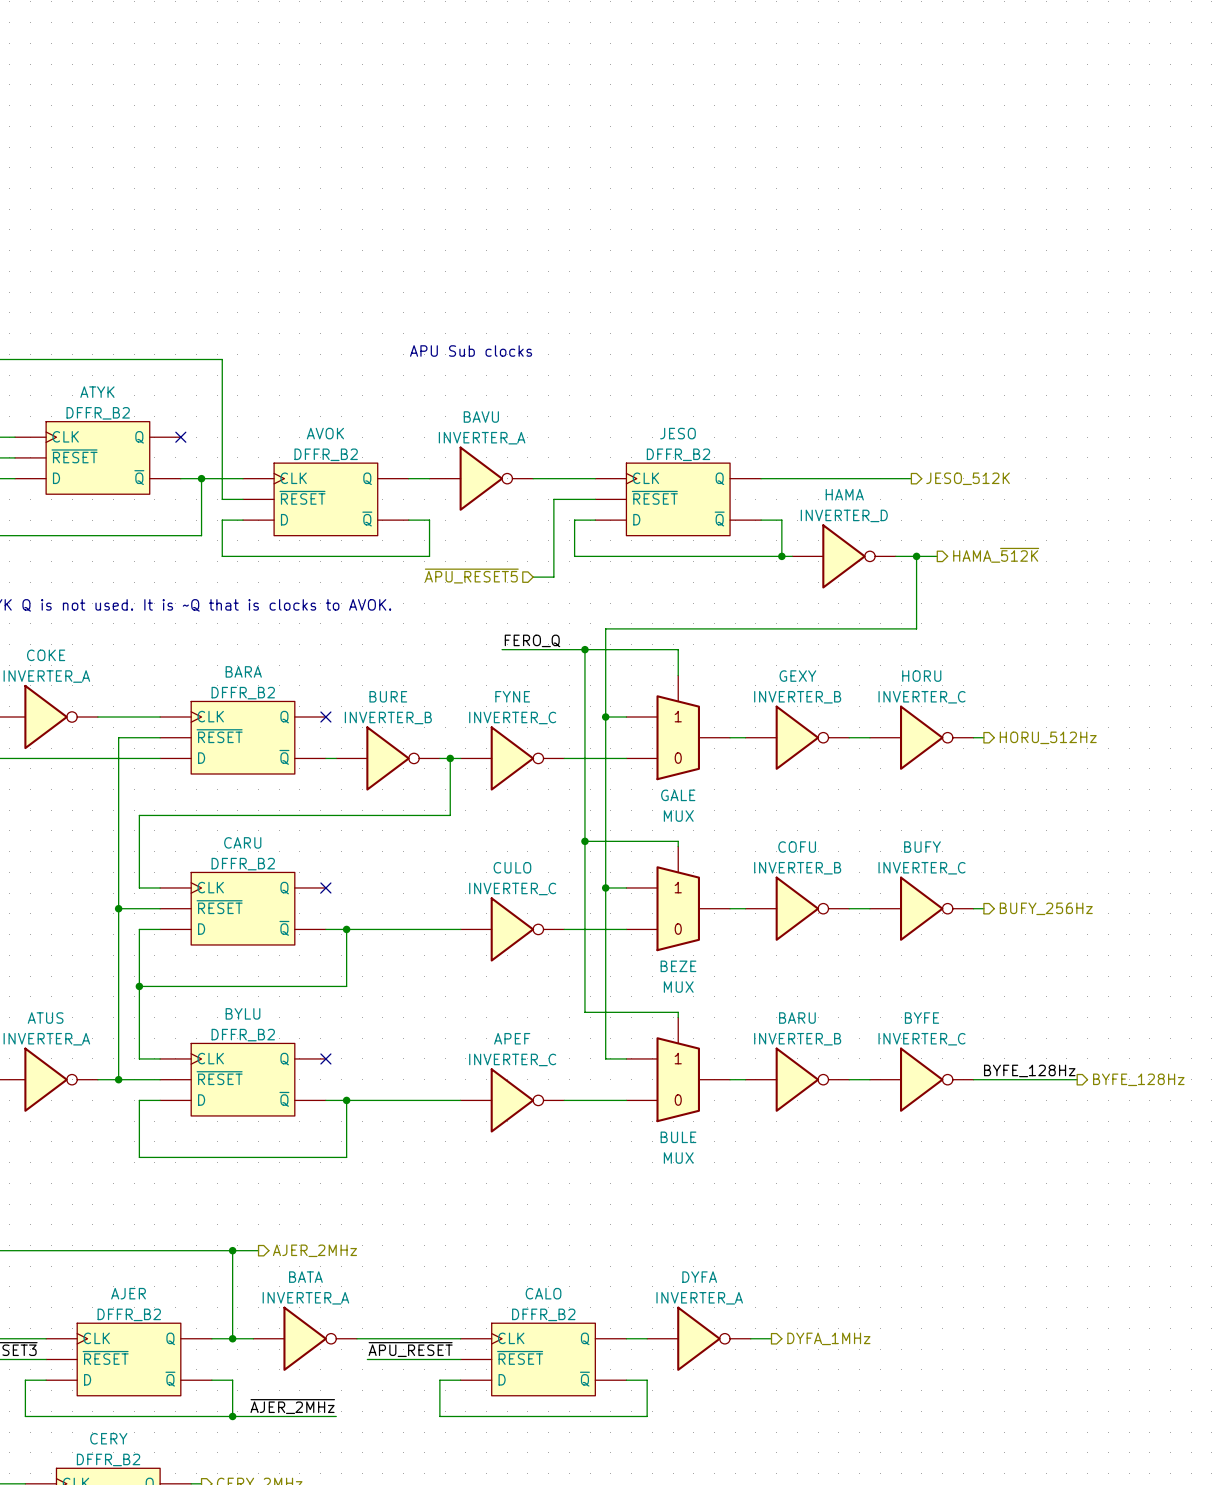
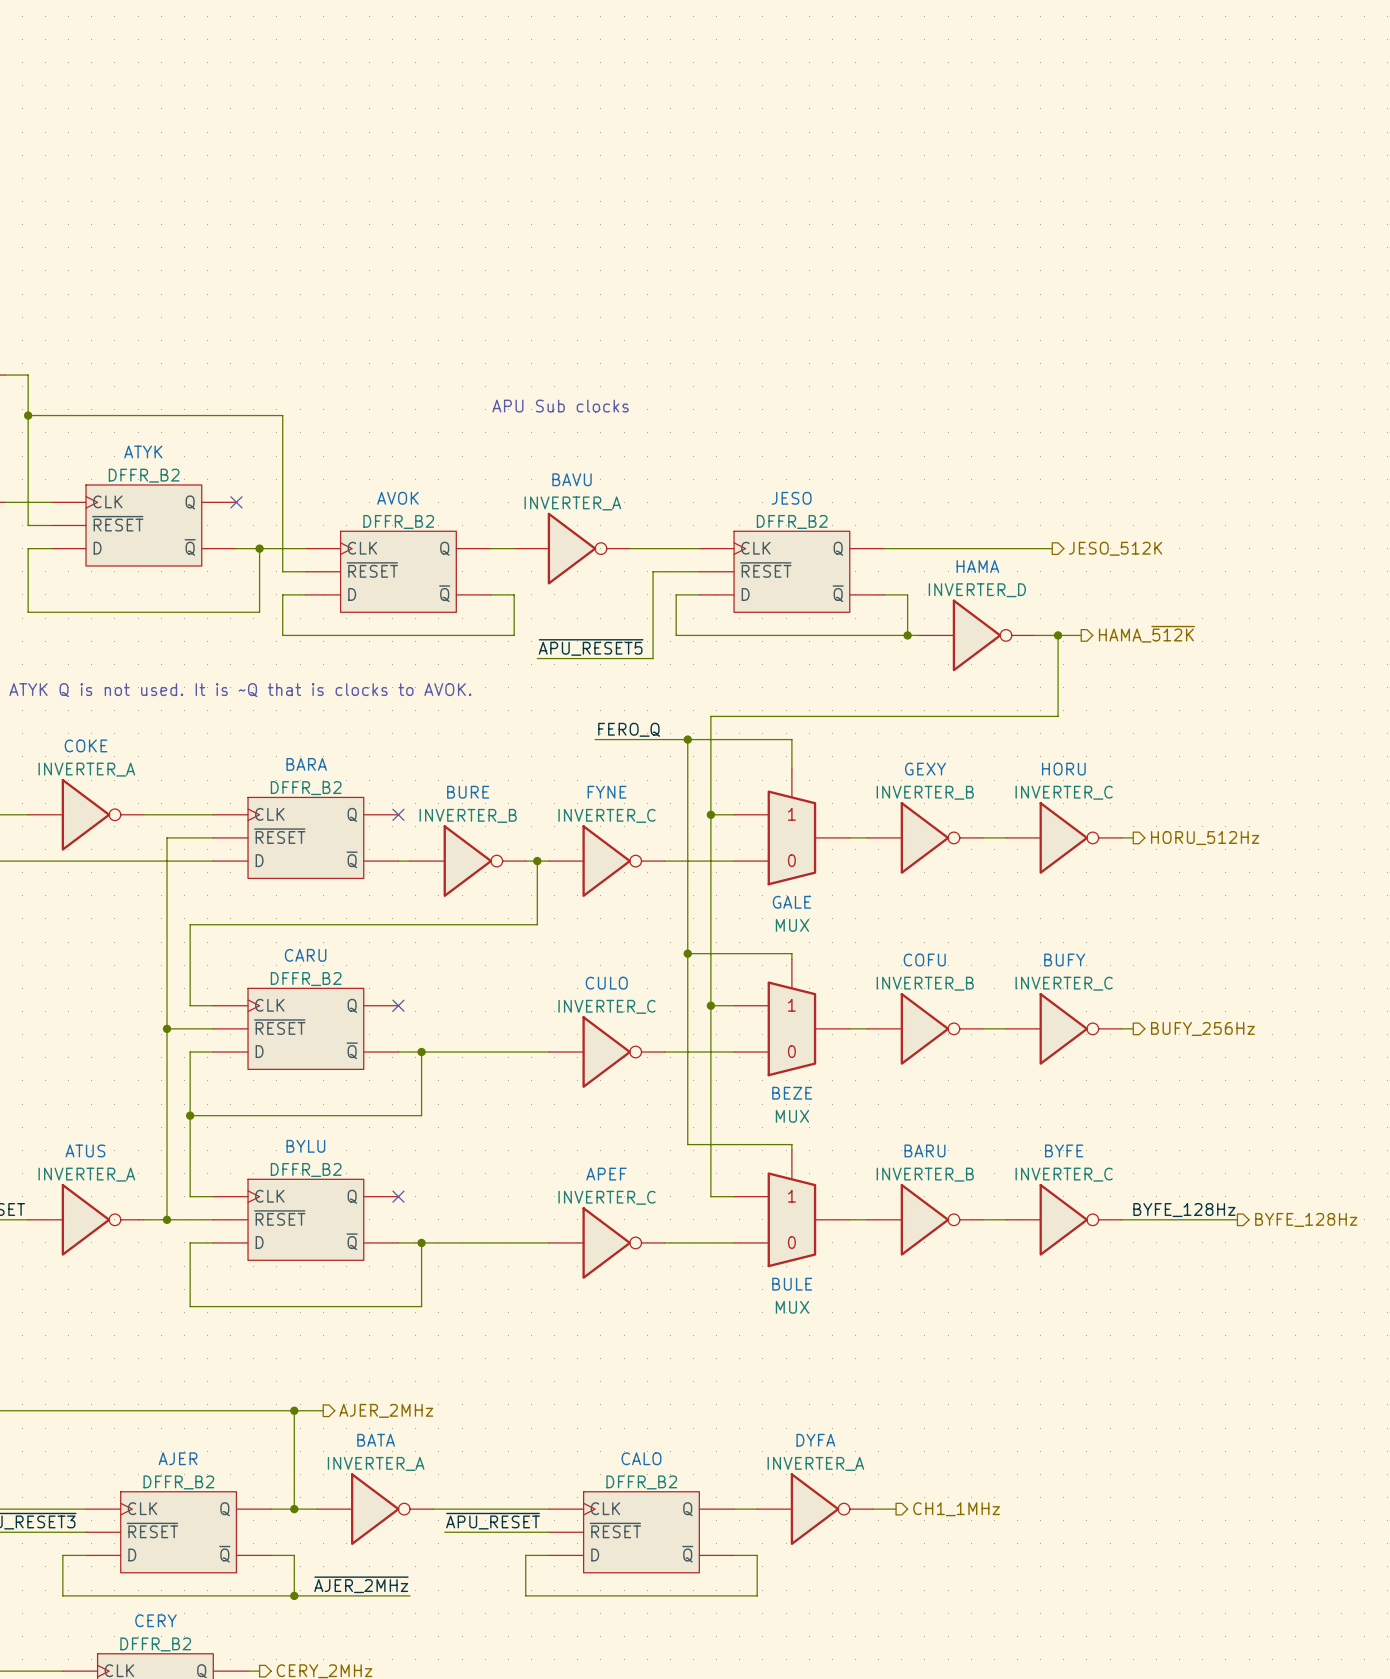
label: none -> ~{APU_RESET5} (591, 647)
hierarchical label: ~{APU_RESET5} (471, 576) -> none
wire: none -> (537, 658) (629, 658)
hierarchical label: DYFA_1MHz (828, 1338) -> CH1_1MHz (956, 1509)

